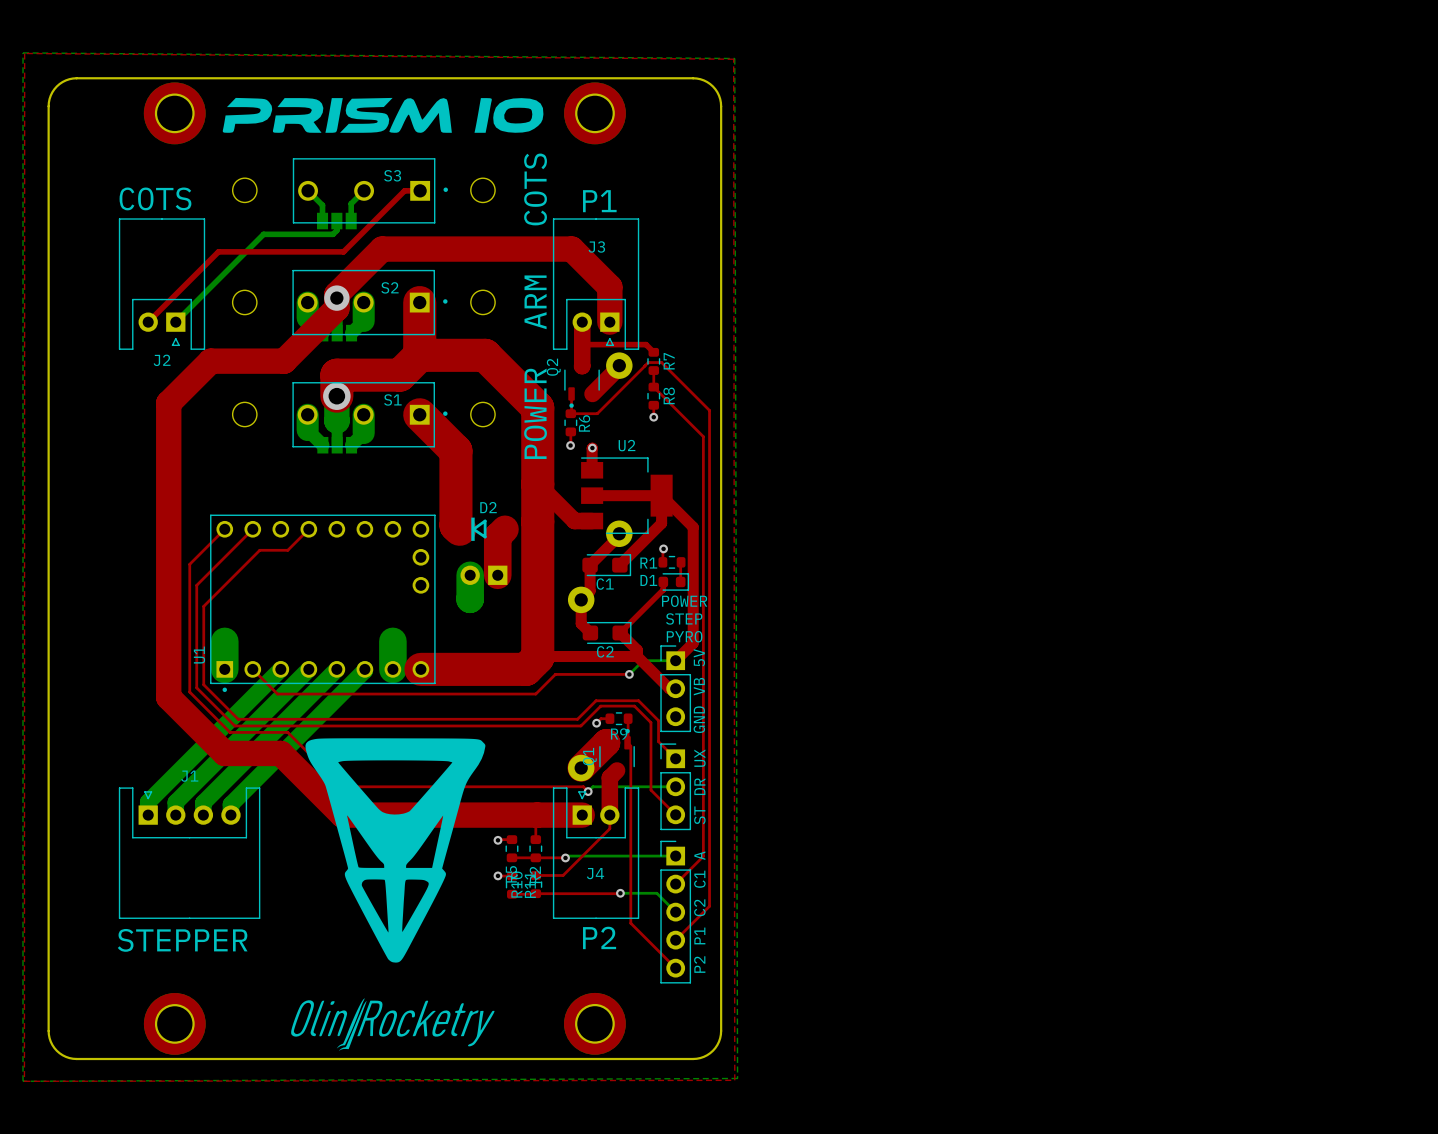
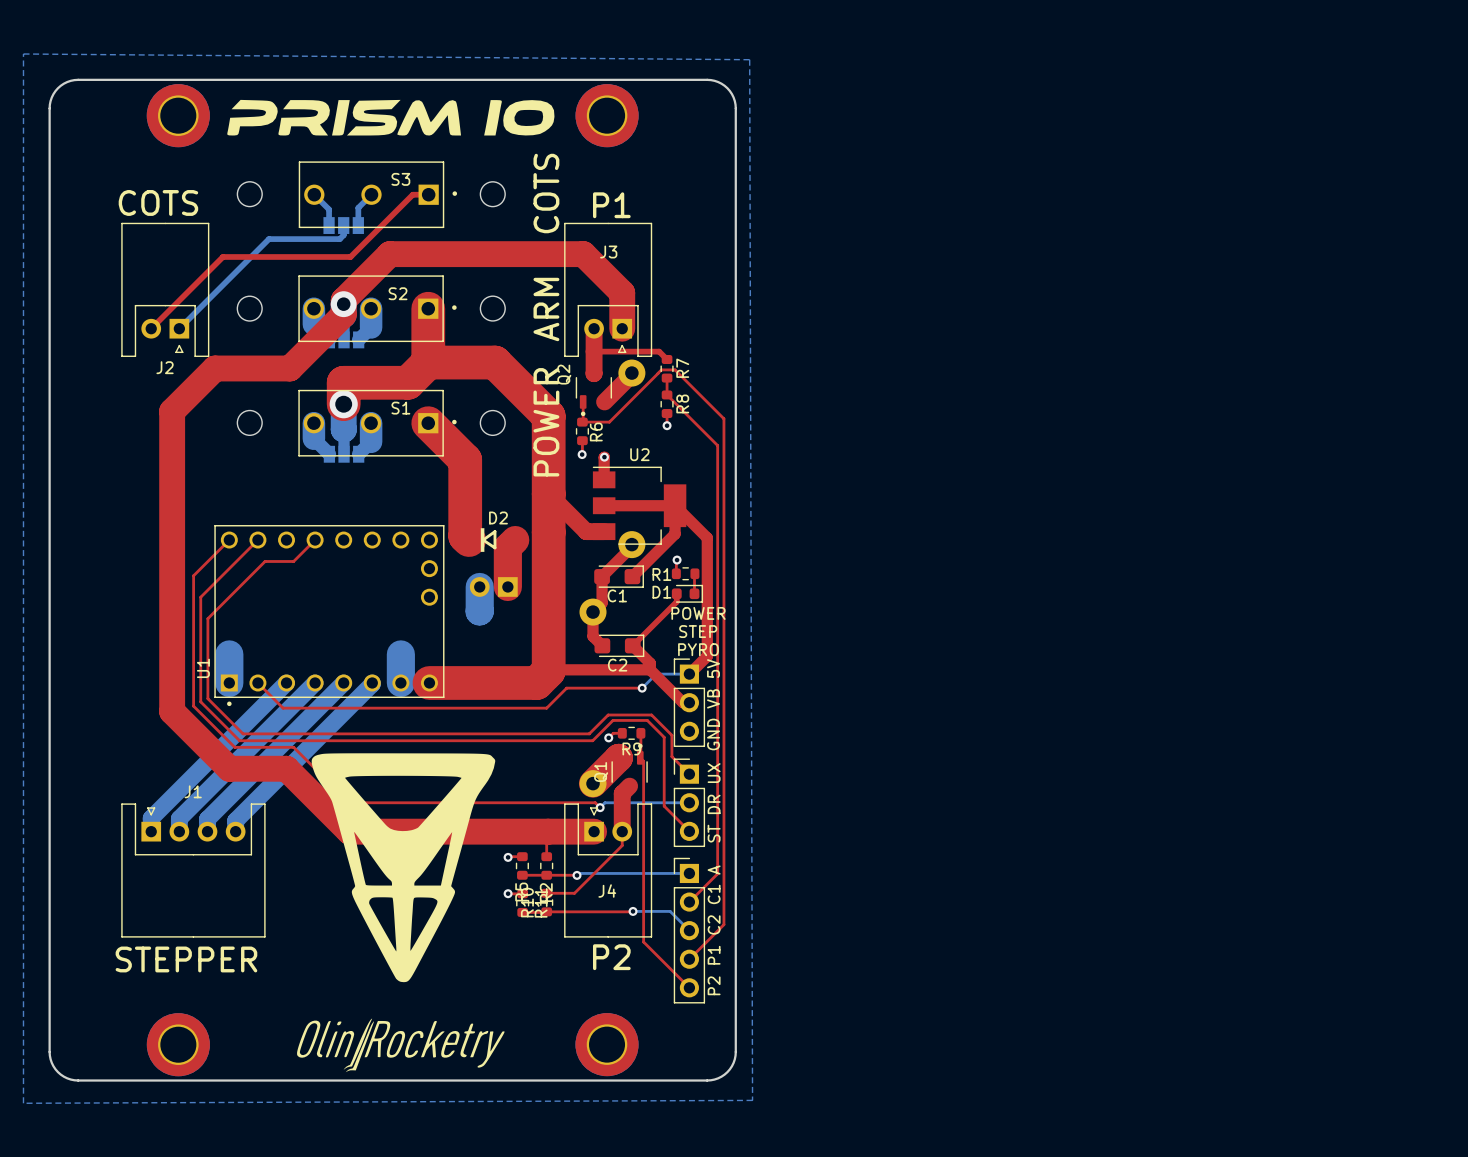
top zone outline: (24, 53) (24, 1081) (734, 1080) (733, 59) (24, 53) -> none

